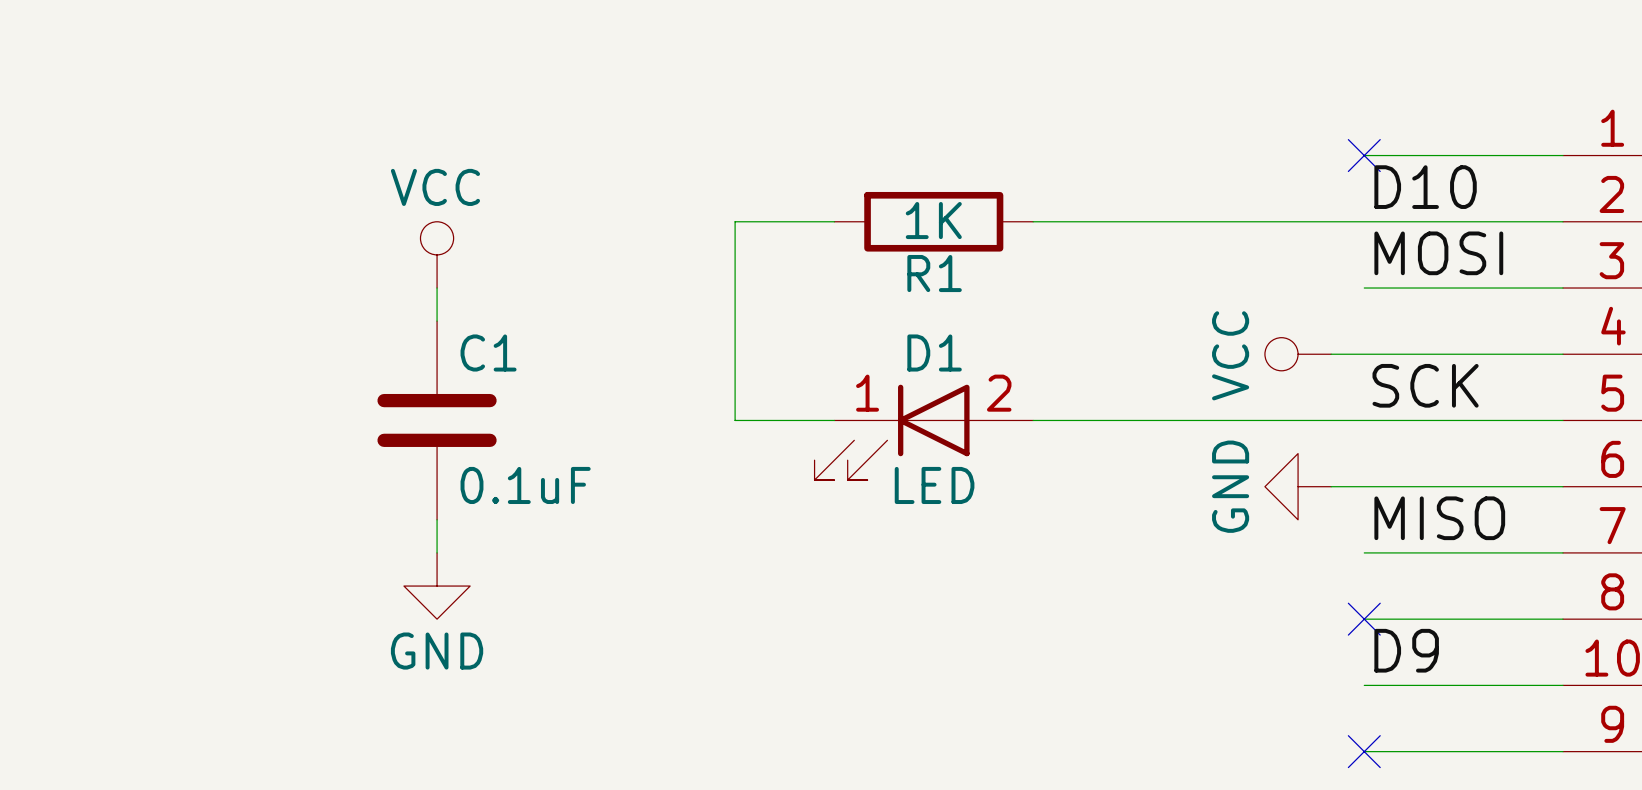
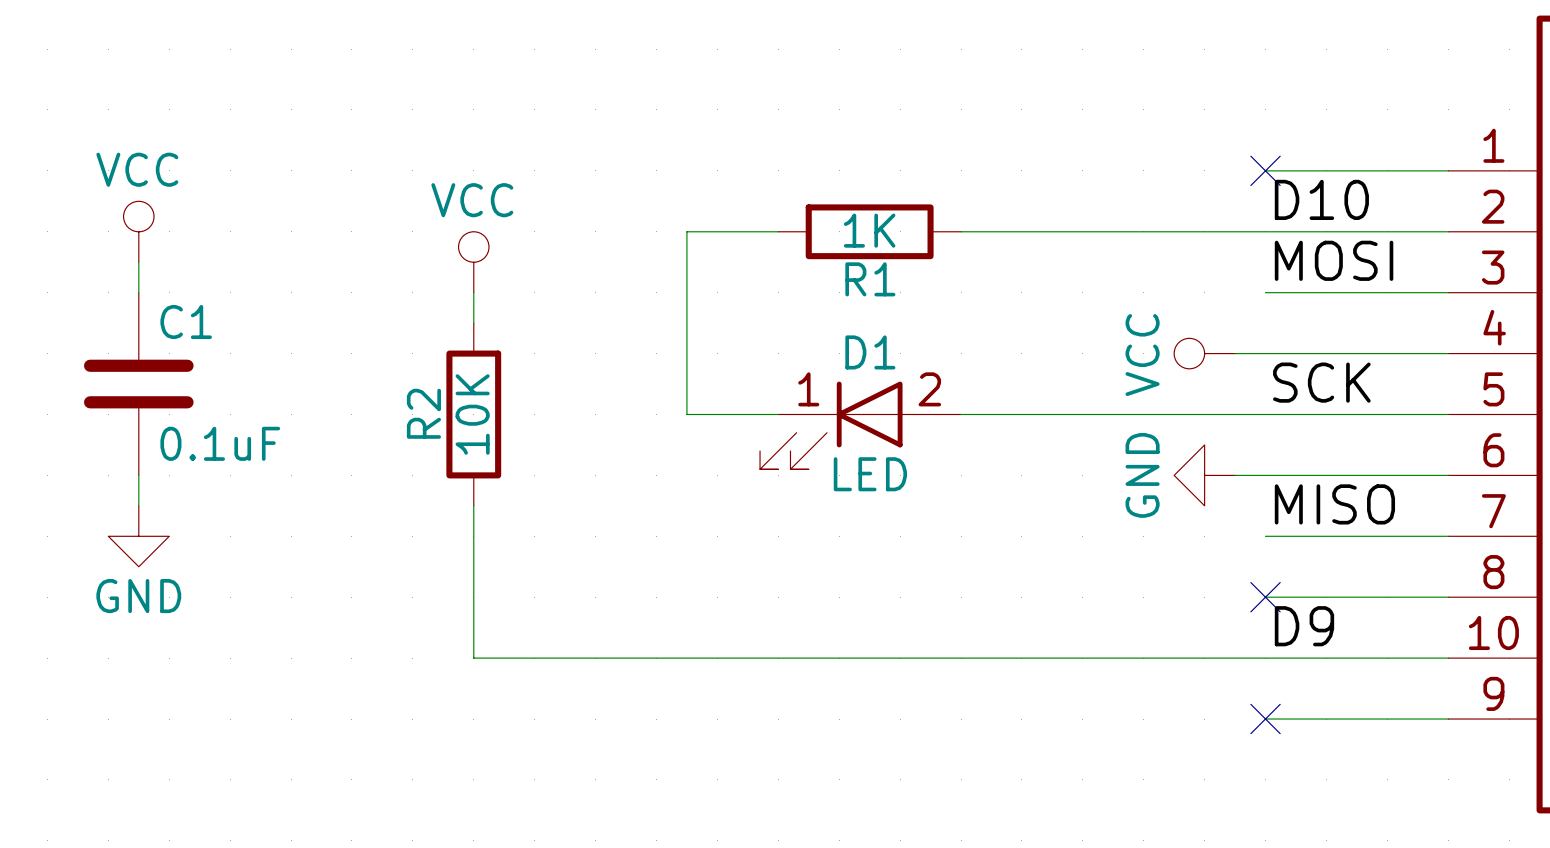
power symbol: none -> VCC (138, 231)
wire: none -> (138, 262) (138, 292)
power symbol position: VCC (437, 254) -> VCC (473, 262)
wire: (437, 288) (437, 321) -> (473, 292) (473, 323)
C1 position: (437, 420) -> (138, 384)
R2: none -> 10K (473, 414)
wire: (437, 519) (437, 552) -> (138, 475) (138, 505)
wire: none -> (473, 505) (473, 658) (1265, 658)
power symbol position: GND (437, 586) -> GND (138, 536)

